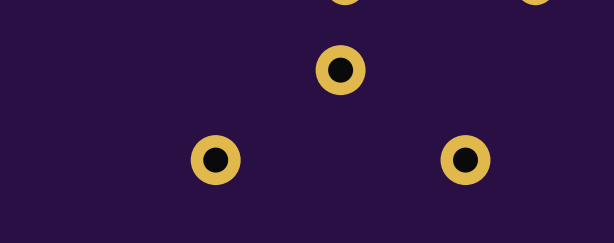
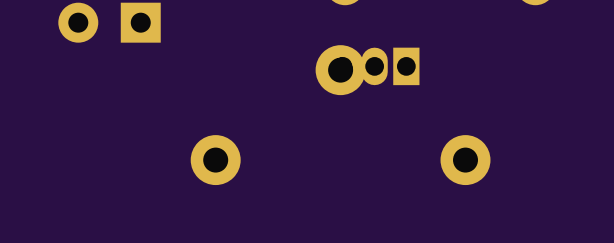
part: none -> (109, 22)
part: none -> (374, 66)

